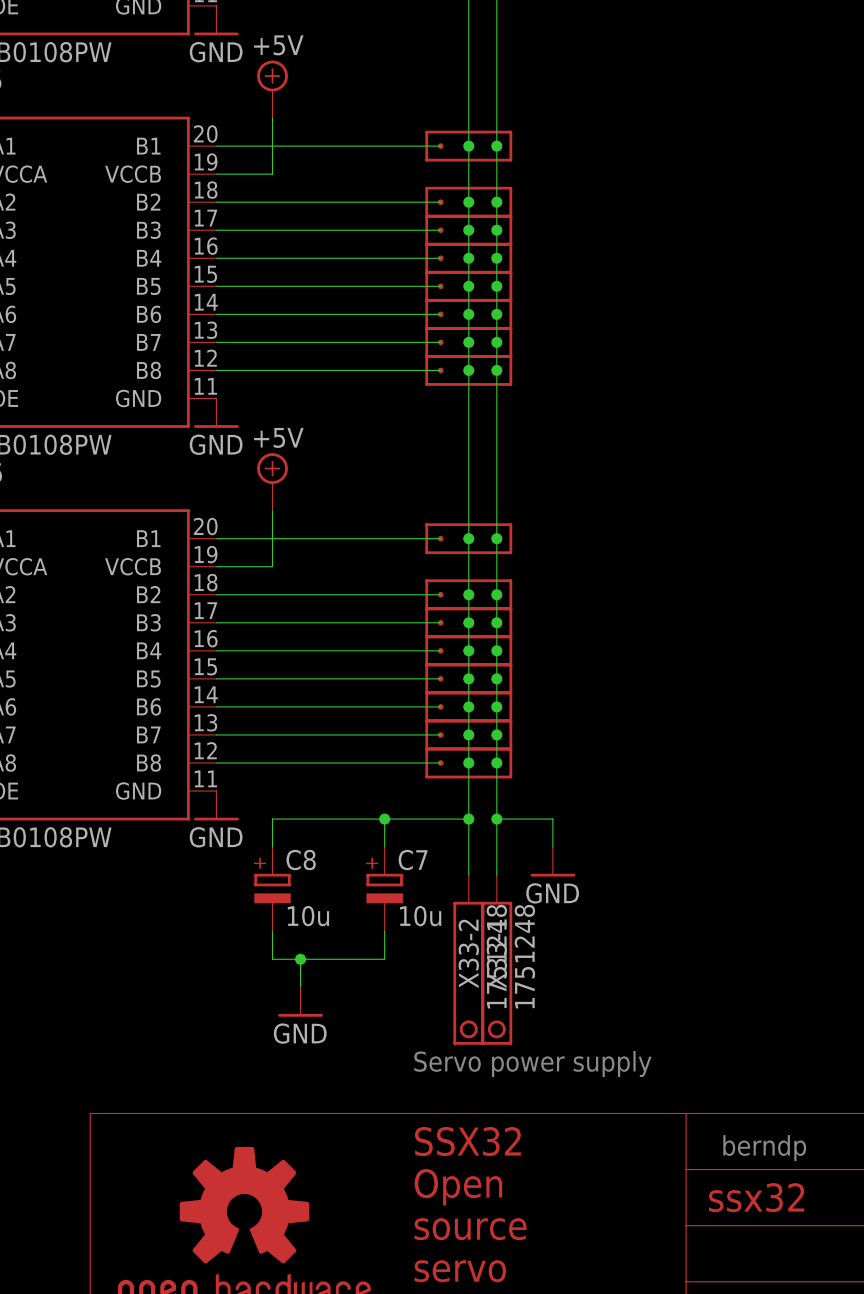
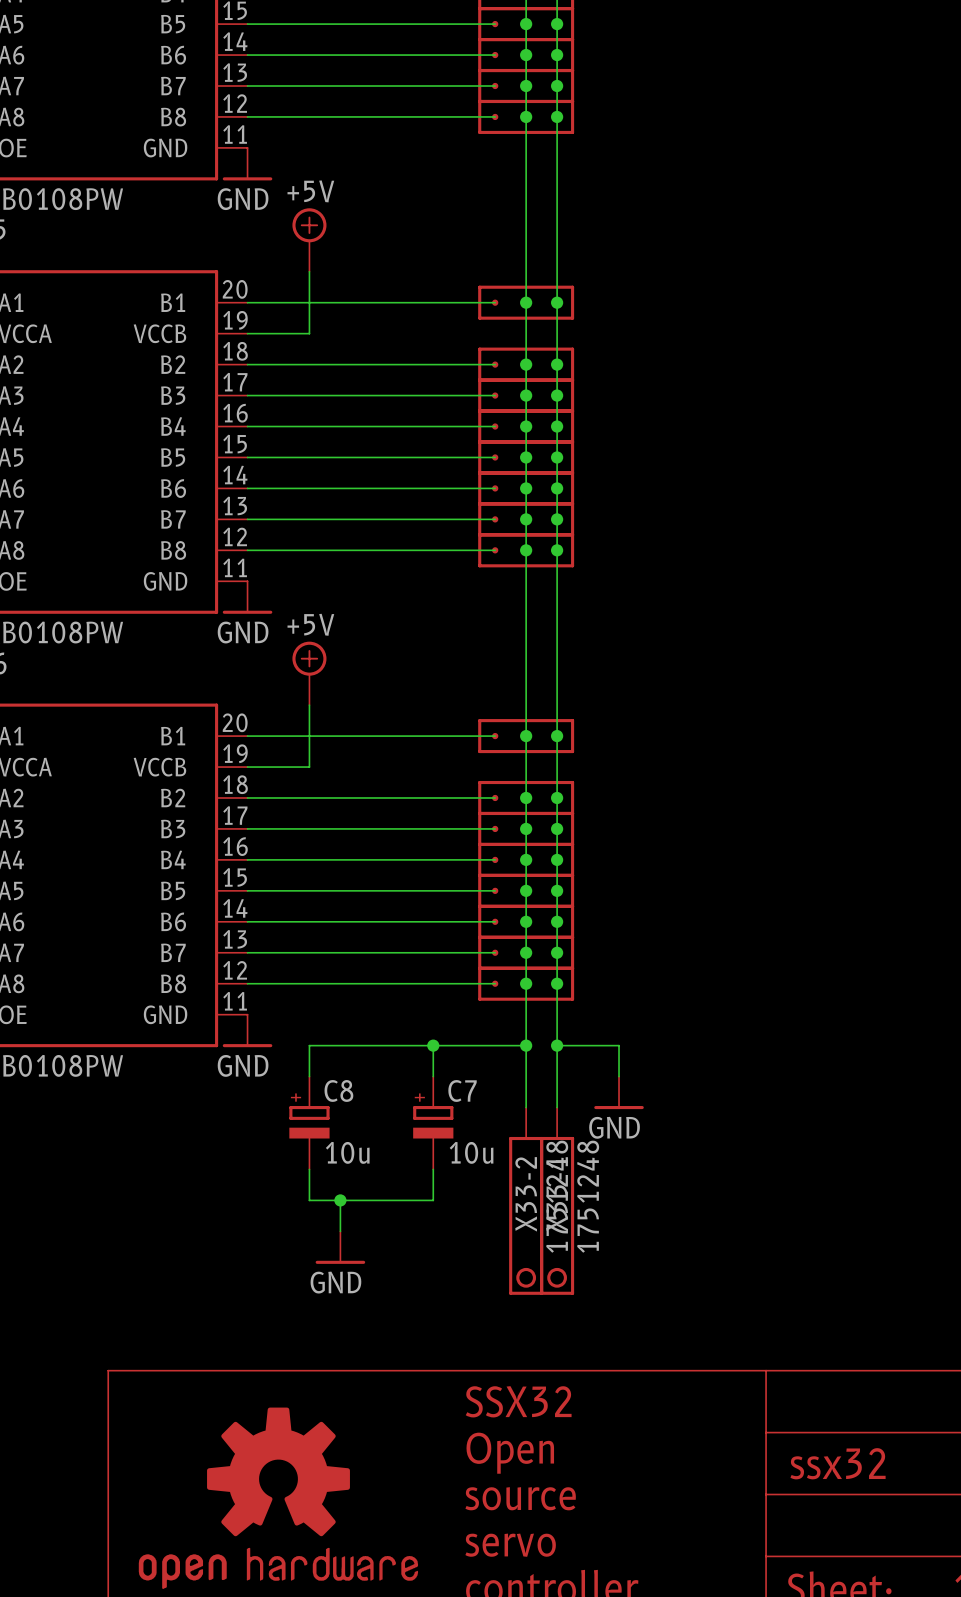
text: Servo power supply (532, 1064) -> none
text: berndp (764, 1148) -> none

